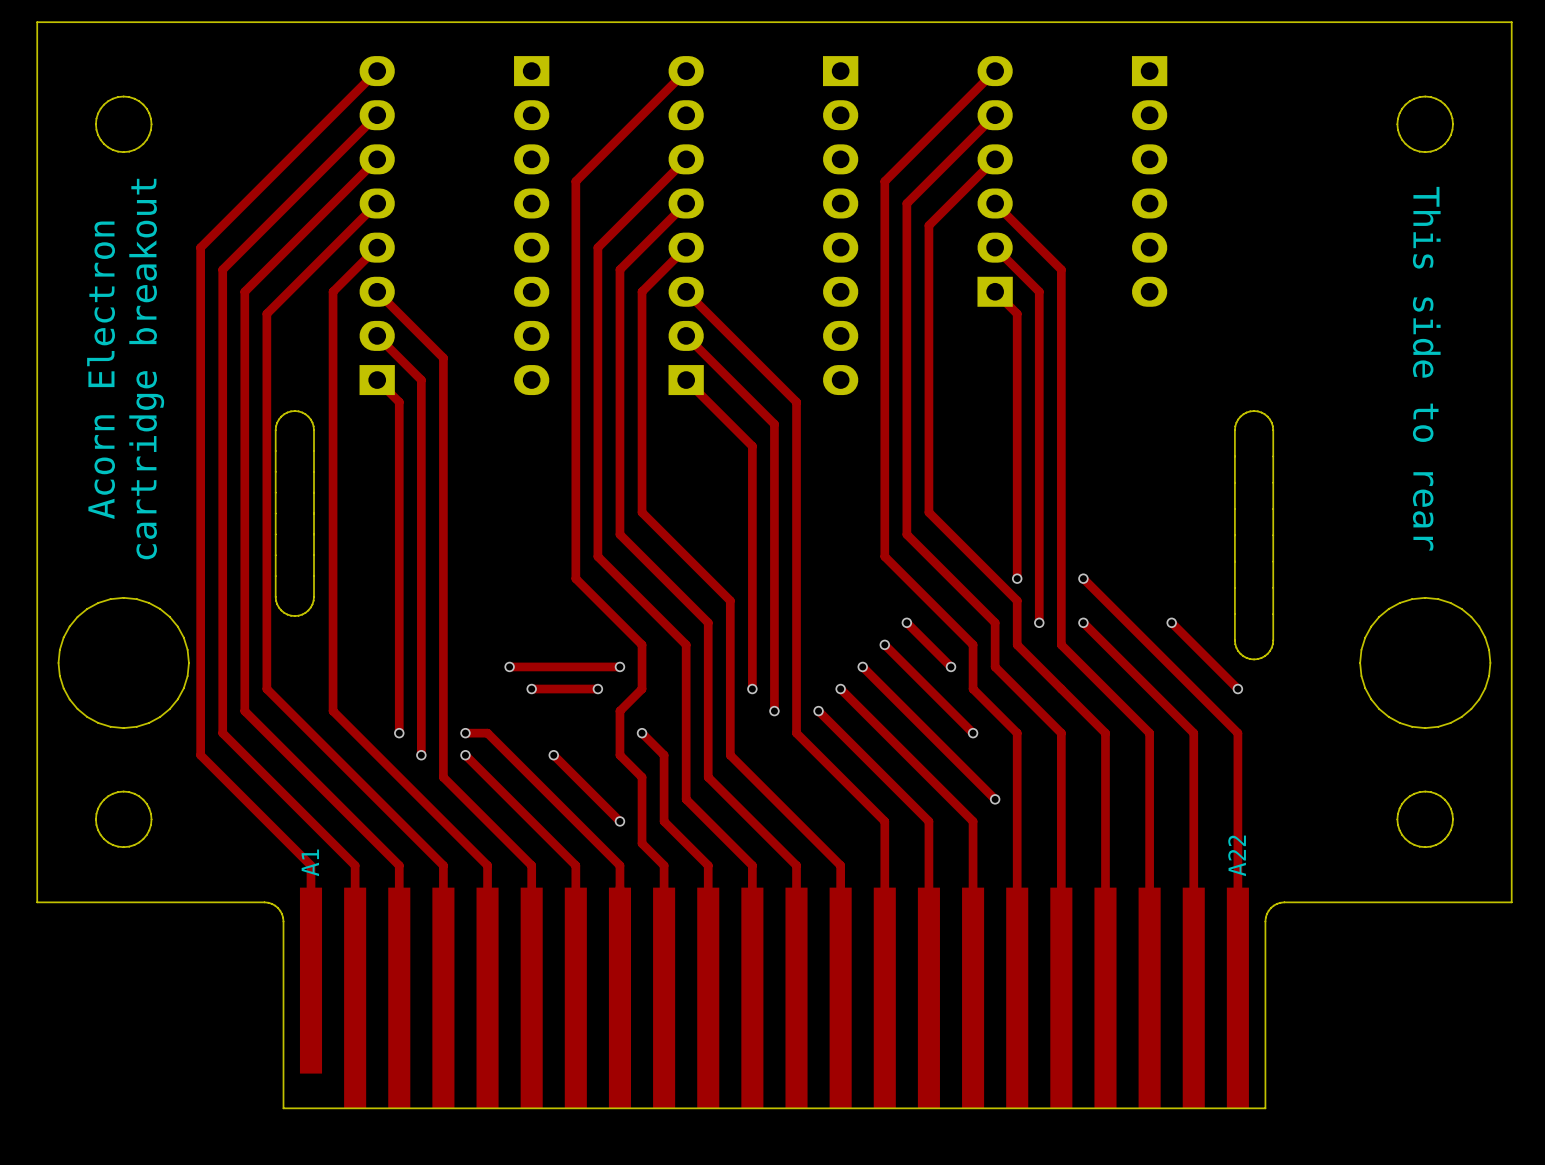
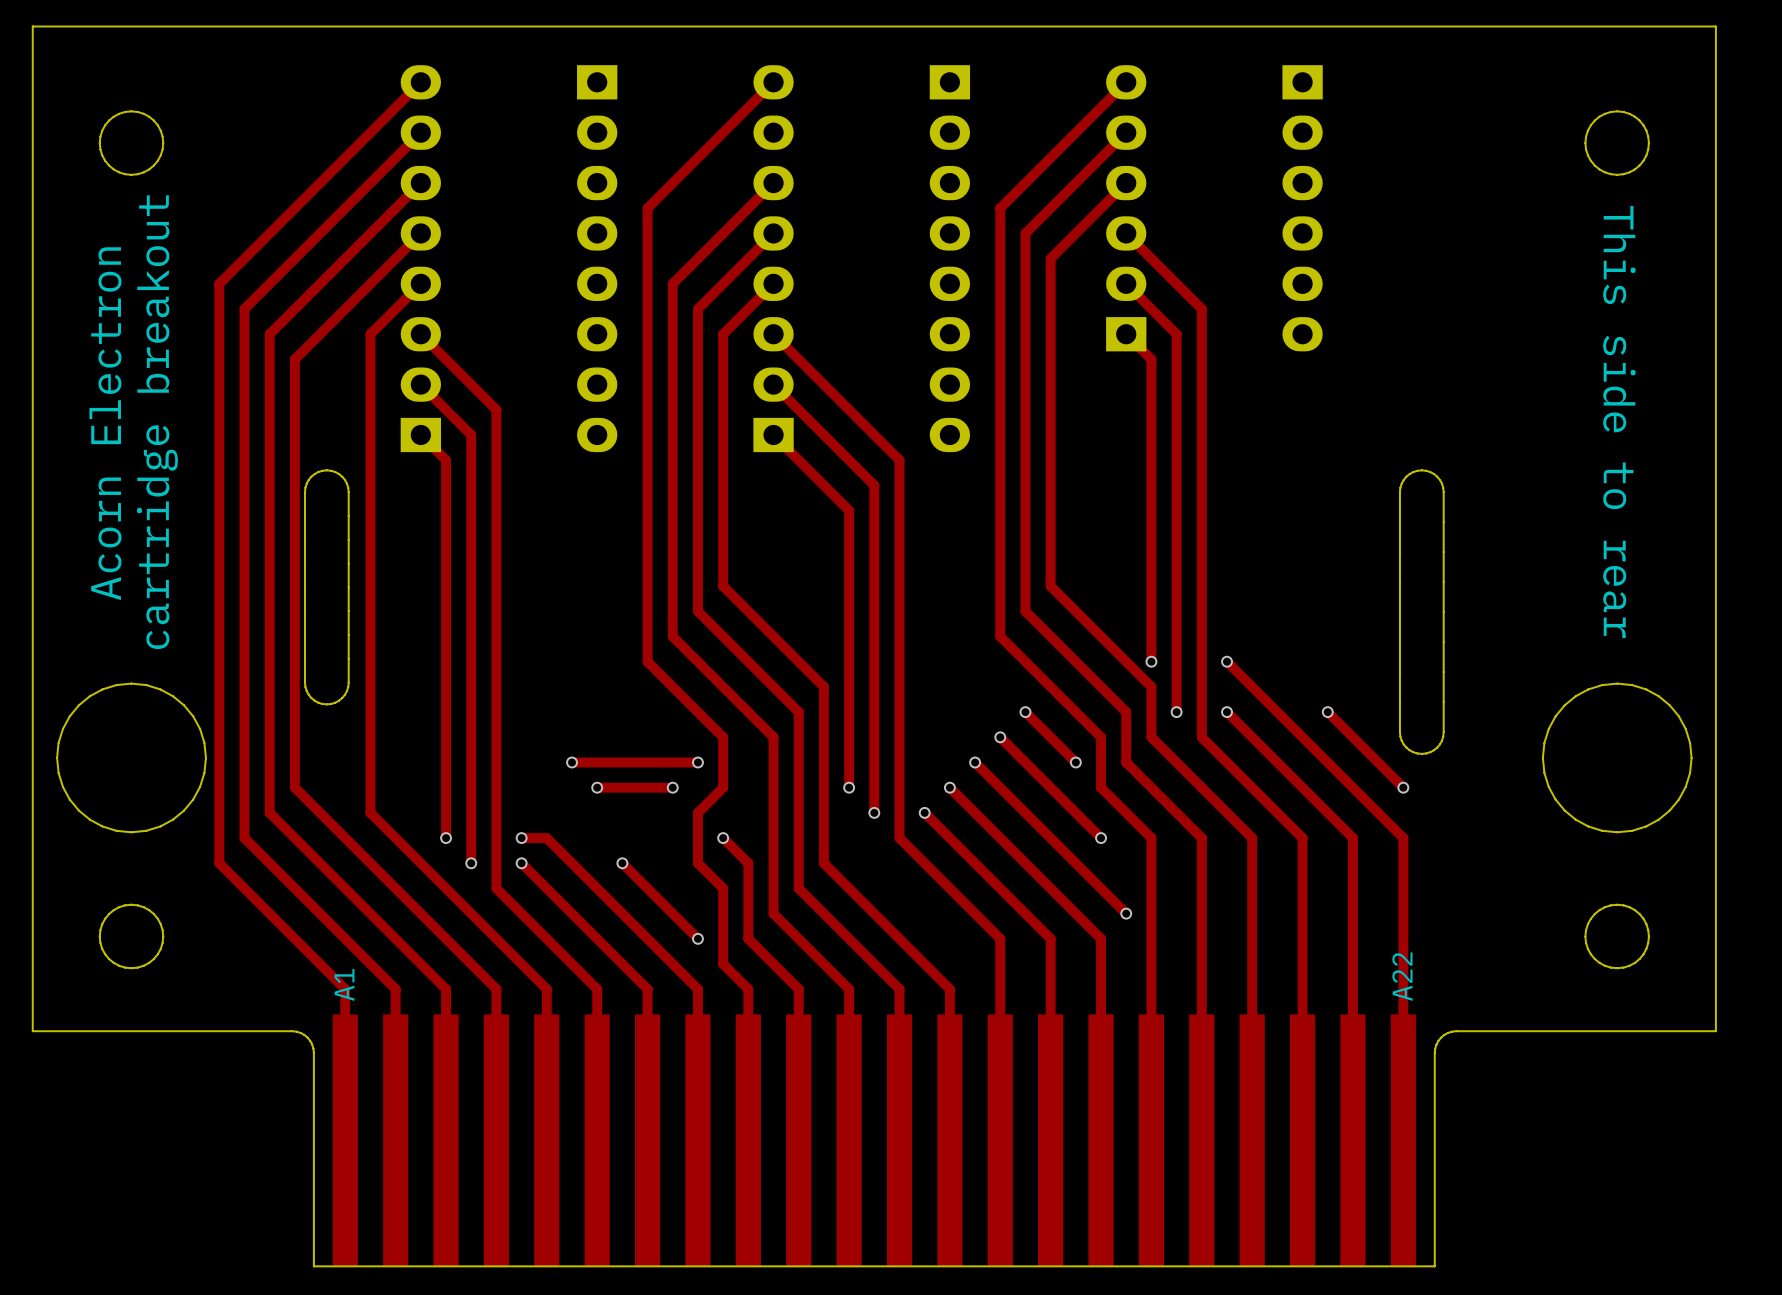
part footprint: [299, 887, 1249, 1109] -> [332, 1014, 1416, 1267]

